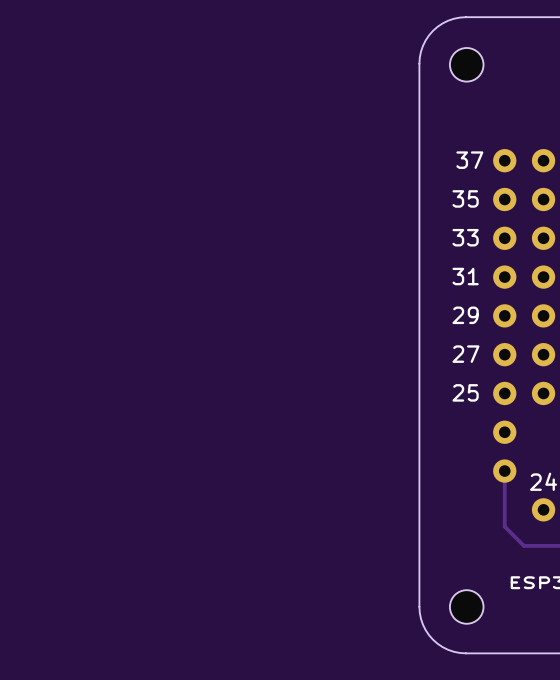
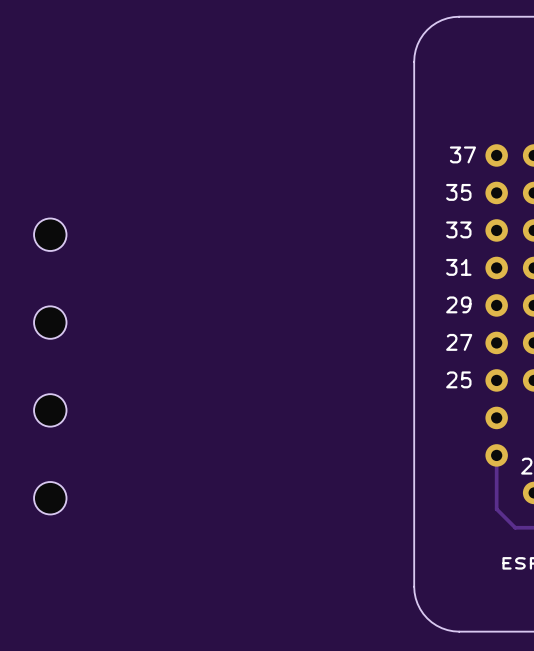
part: (466, 64) -> none
part: none -> (50, 234)
part: none -> (50, 322)
part: none -> (50, 410)
part: none -> (50, 498)
part: (466, 606) -> none

